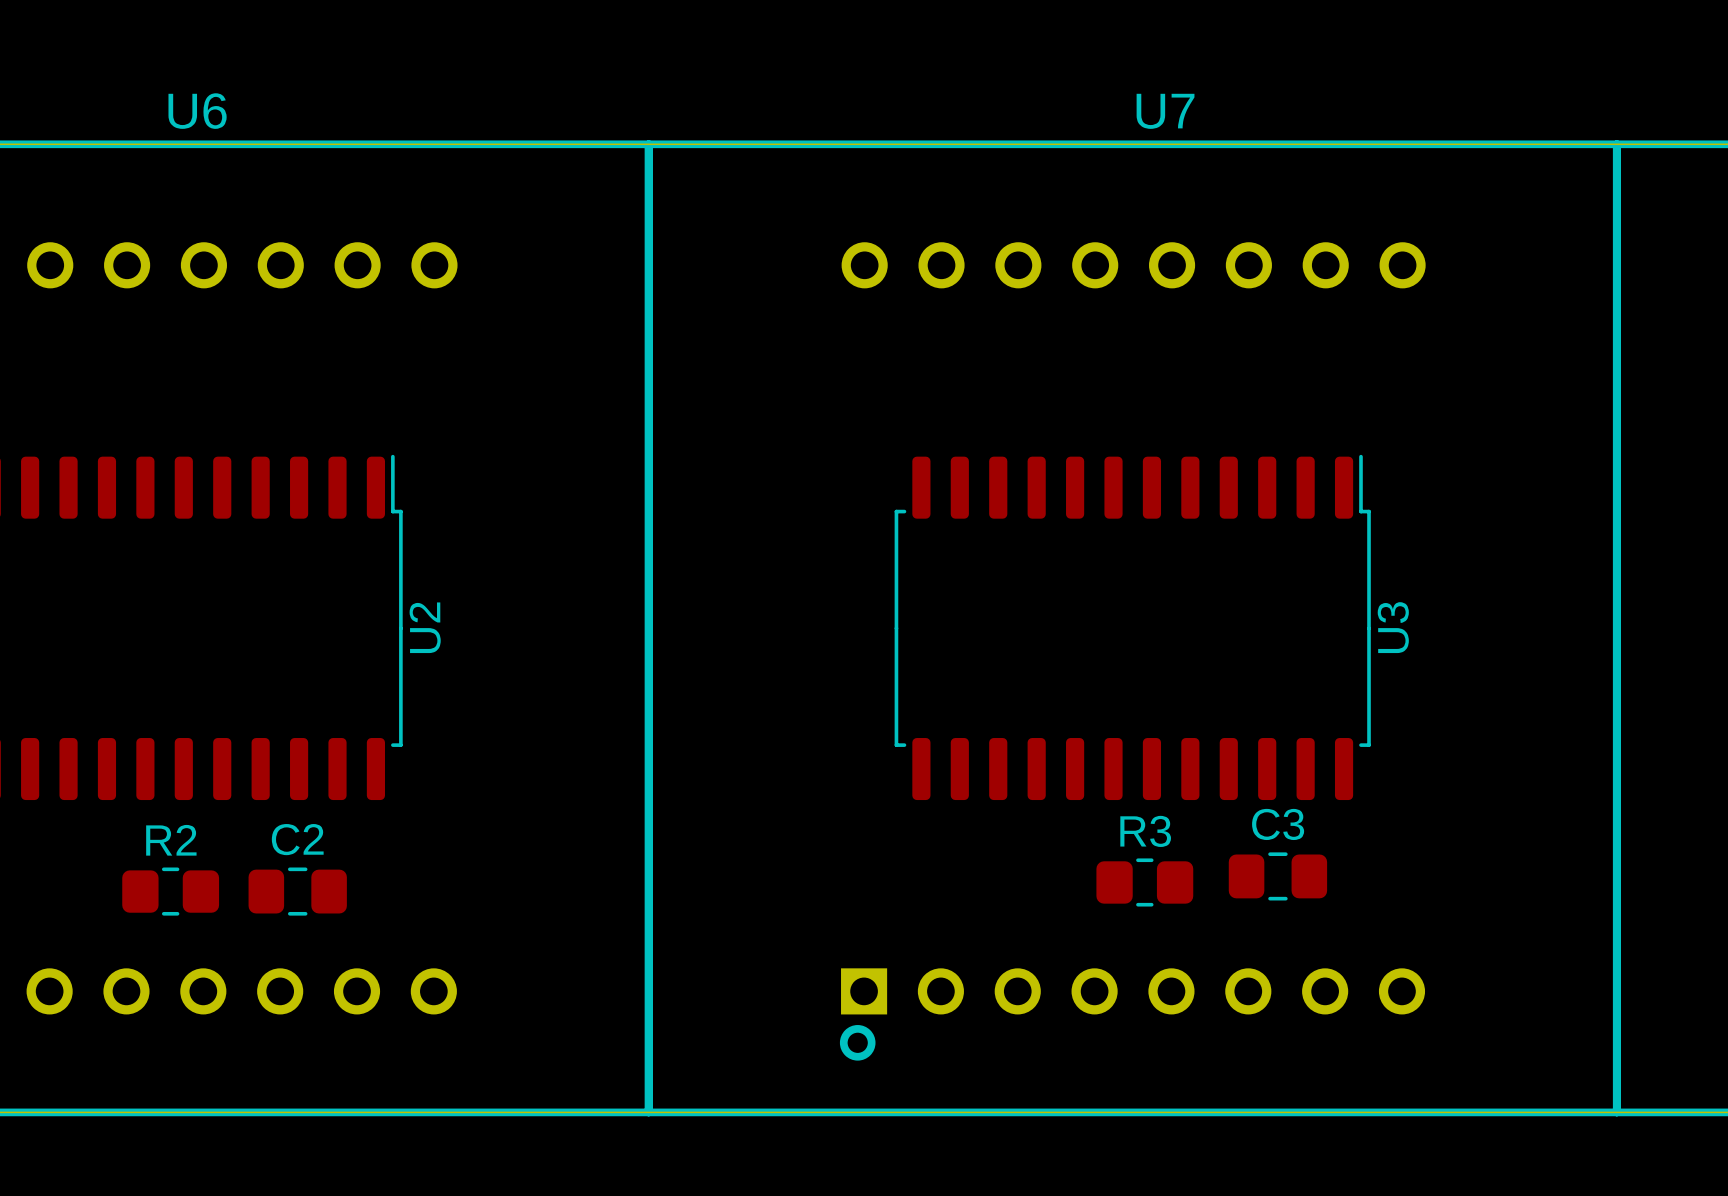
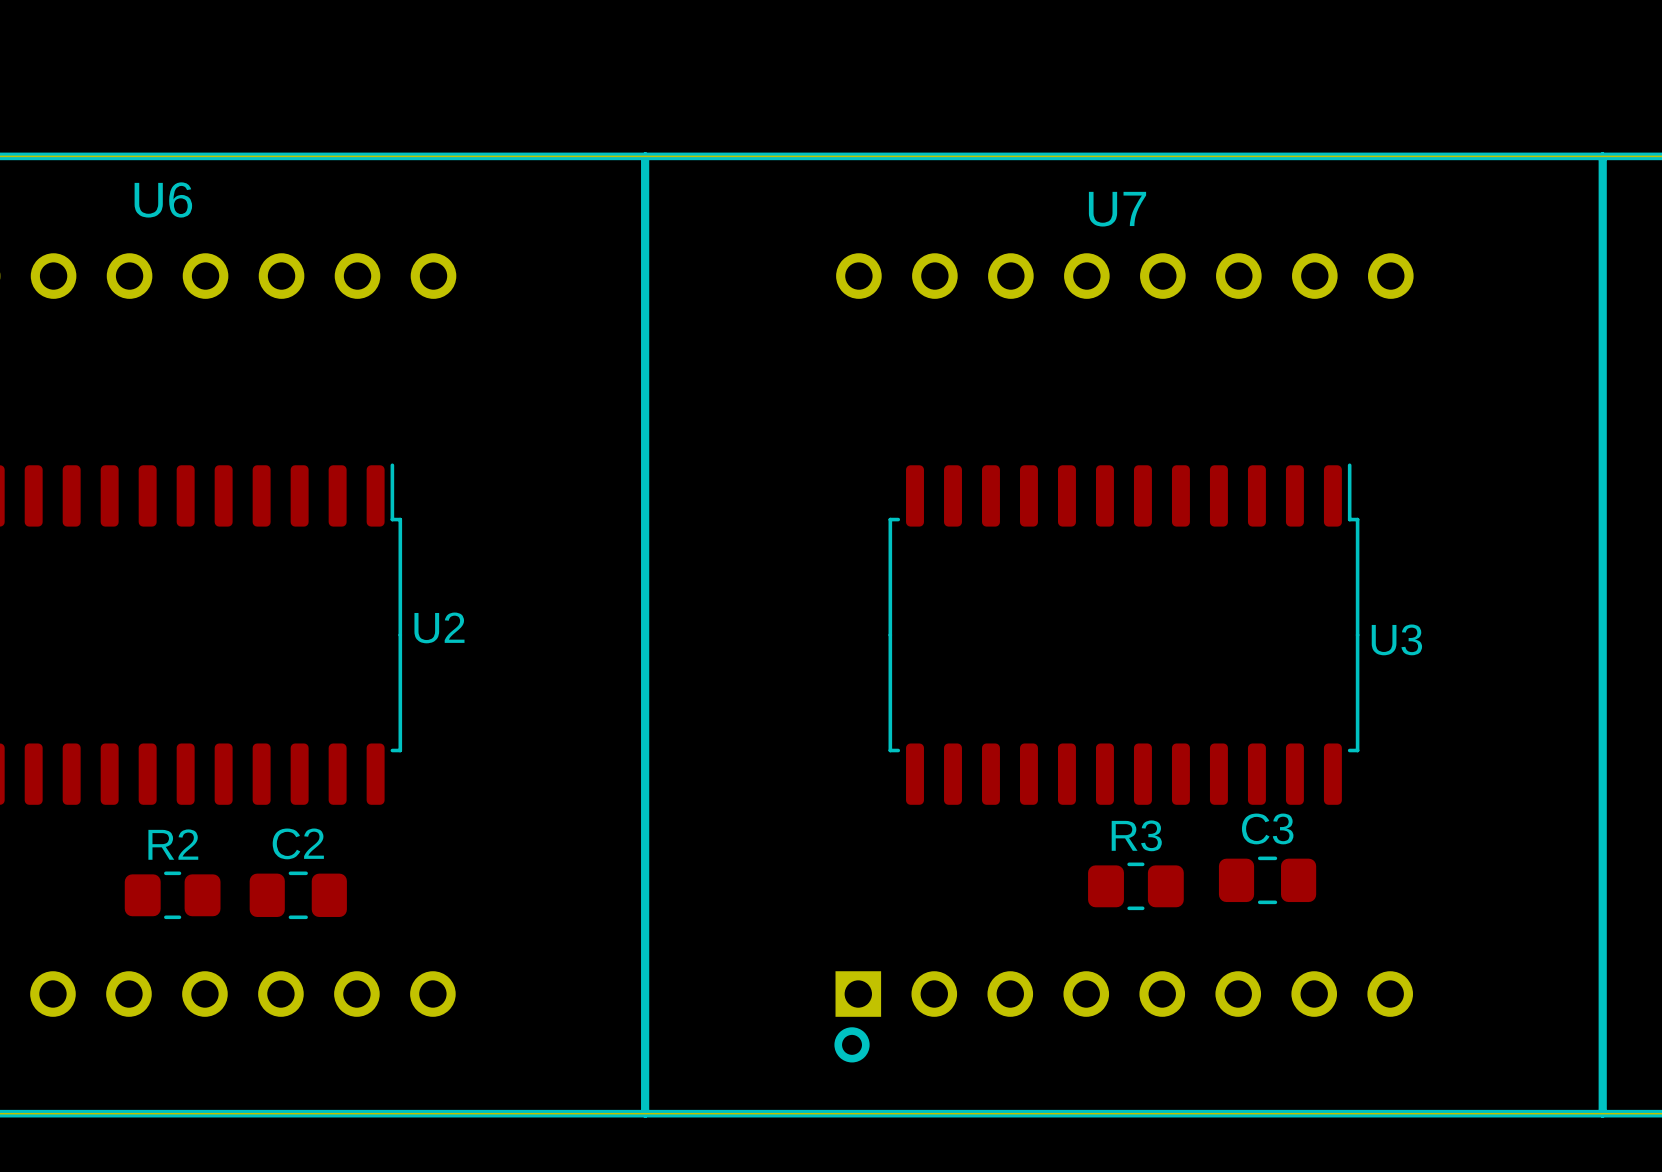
U6 name position: U6 (197, 111) -> U6 (163, 199)
U7 name position: U7 (1165, 111) -> U7 (1117, 209)
U2 name rotation: 0° (425, 627) -> 90° clockwise (439, 627)
U3 name rotation: 0° (1393, 627) -> 90° clockwise (1396, 639)

